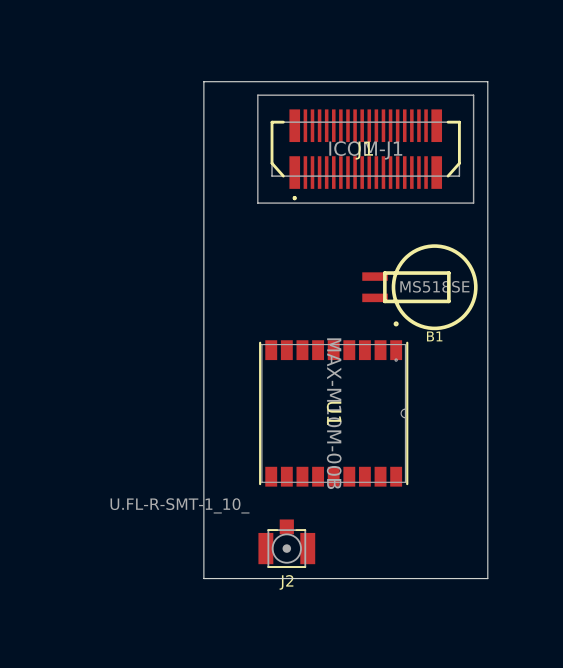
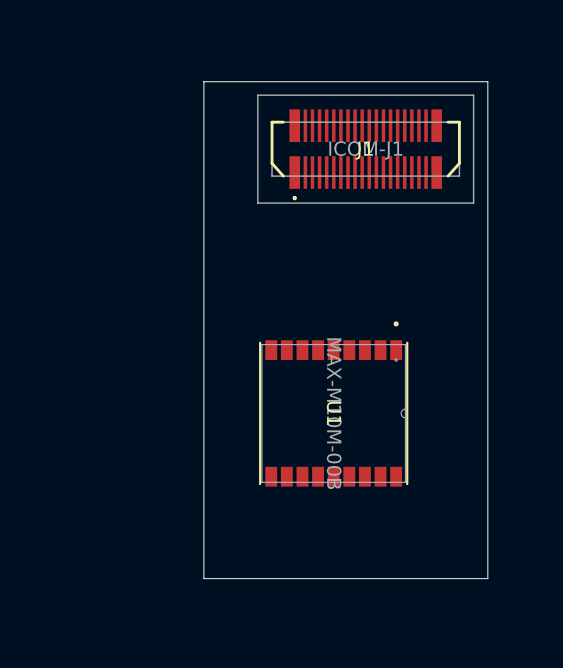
B1: MS518SE (419, 287) -> none
J2: U.FL-R-SMT-1_10_ (286, 543) -> none

